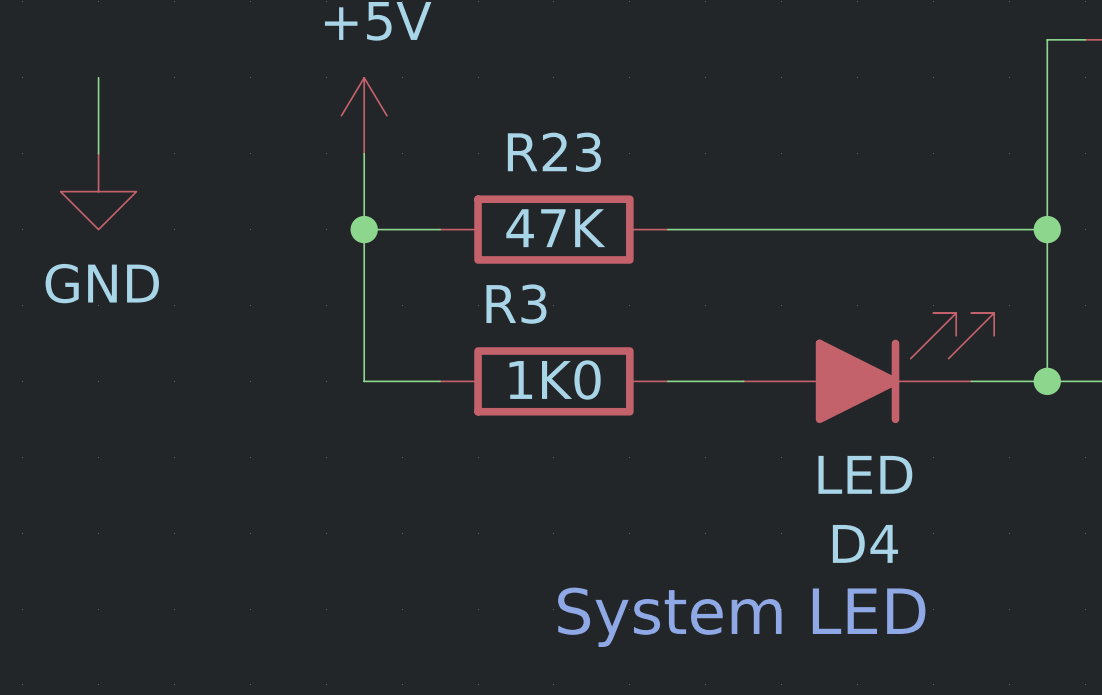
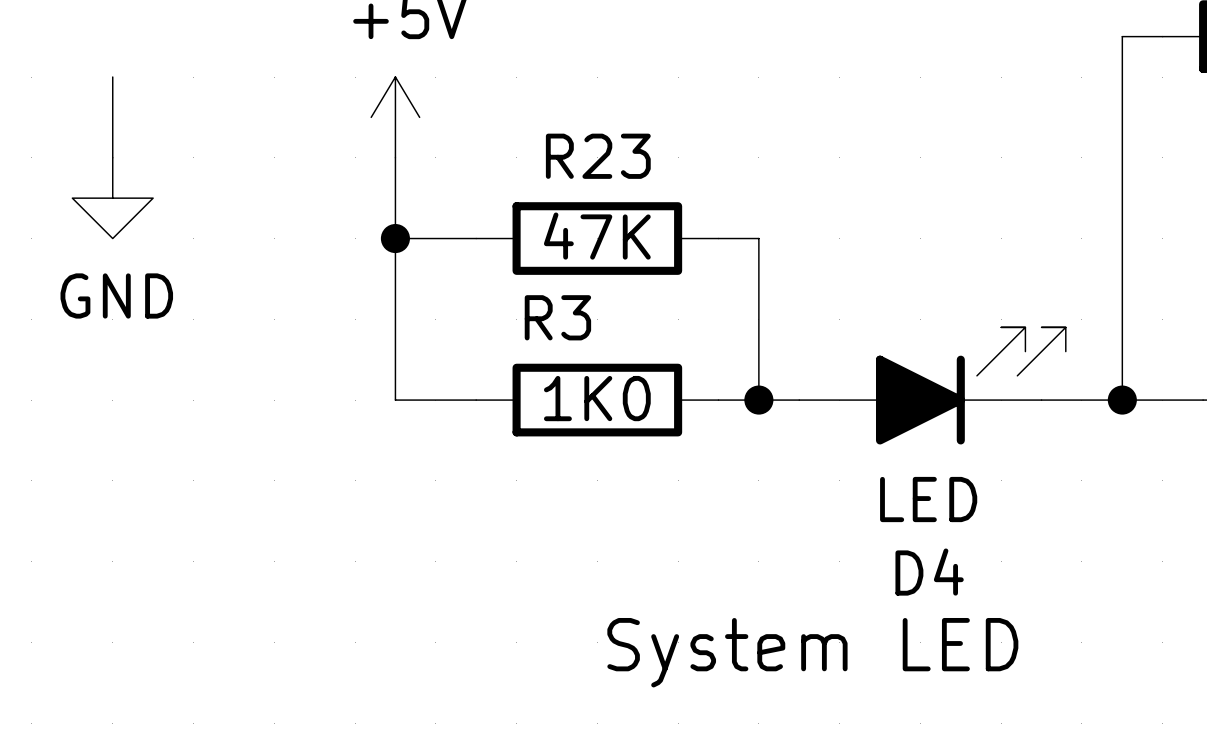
wire: (705, 229) (1047, 229) -> (758, 238) (758, 400)
junction: (1047, 229) -> none
junction: none -> (758, 400)

